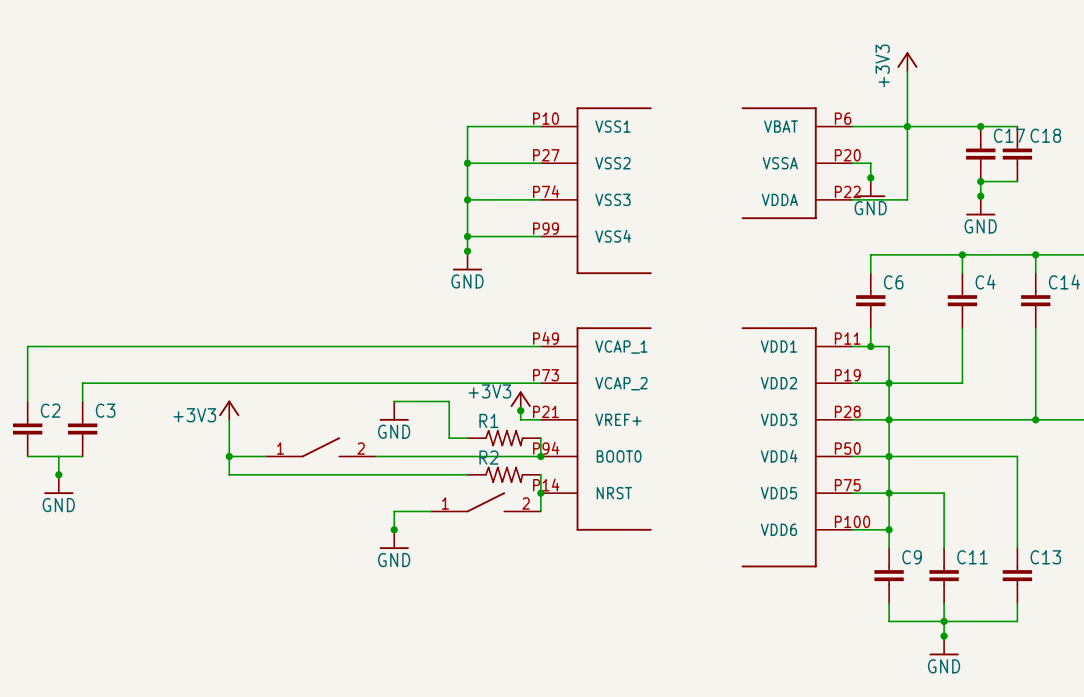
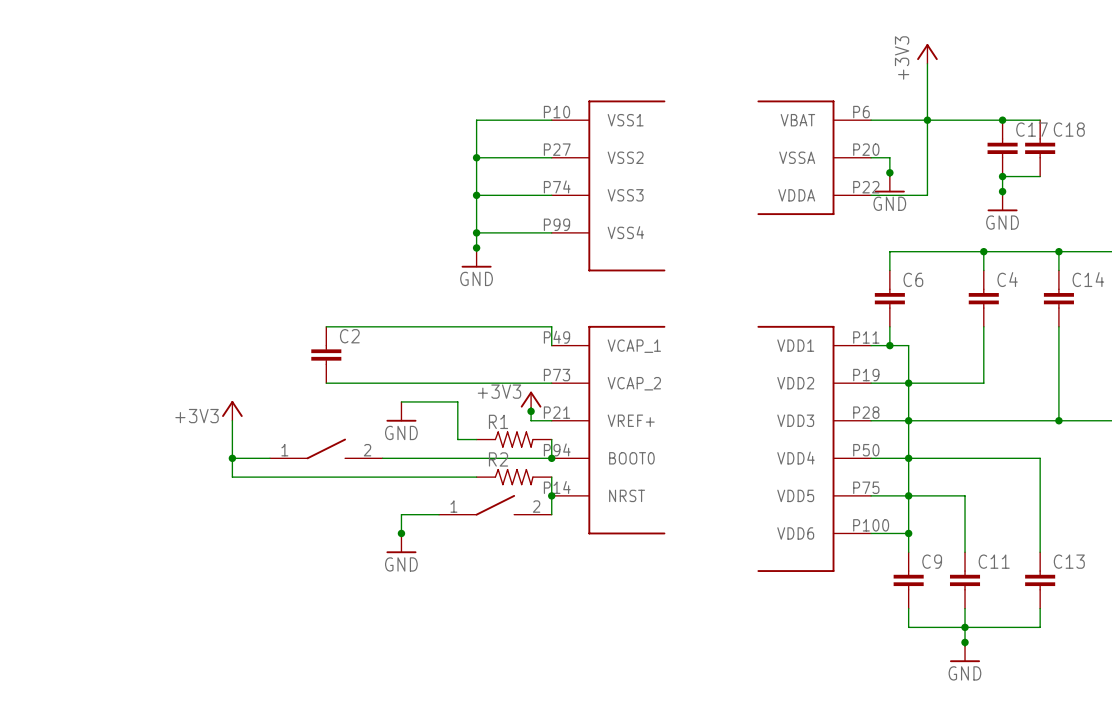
wire: (540, 346) (27, 346) (27, 401) -> (551, 345) (551, 326) (326, 326)
wire: (320, 383) (82, 383) (82, 401) -> none
C2 position: (27, 429) -> (326, 355)
C3: (82, 429) -> none
wire: (27, 456) (82, 456) -> none
wire: (58, 456) (58, 478) -> none
junction: (58, 474) -> none
power symbol: GND (58, 484) -> none

